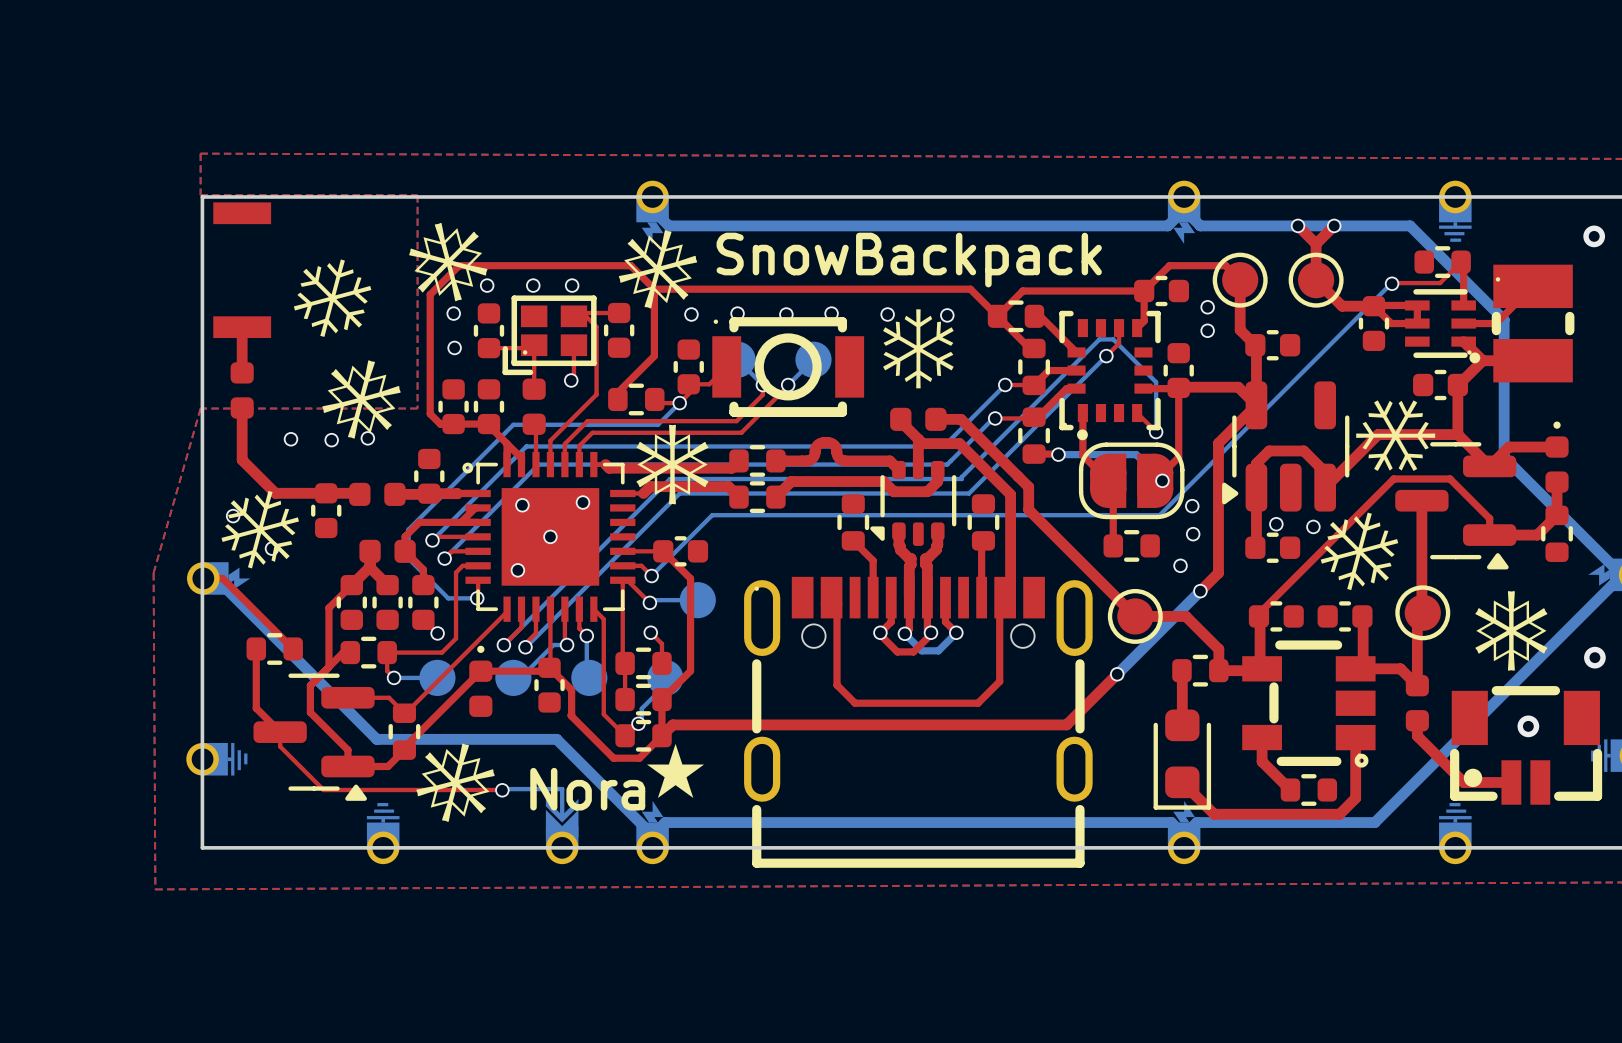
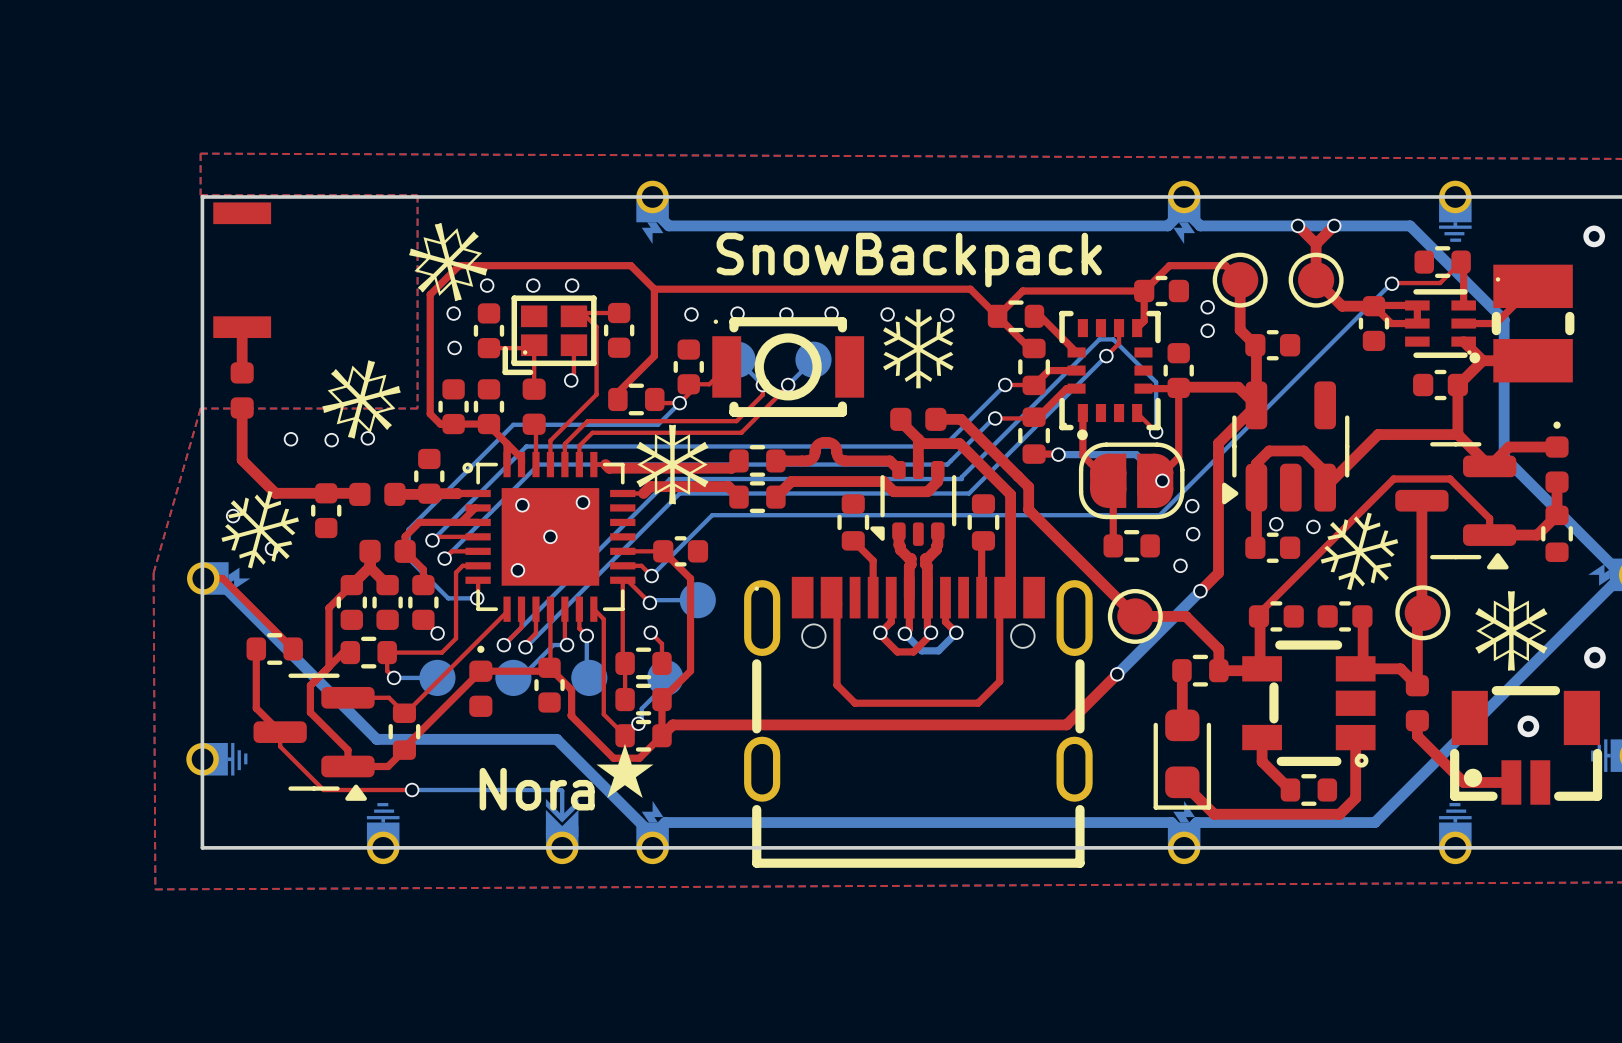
drawing: [618, 230, 698, 309] -> none
drawing: [293, 259, 372, 337] -> none
drawing: [1356, 400, 1436, 471] -> none
drawing: [416, 743, 495, 822] -> none
text position: ⋆ (675, 770) -> ⋆ (624, 770)
text position: Nora (587, 789) -> Nora (537, 789)
top track: (412, 790) (502, 790) -> none
bottom track: (502, 790) (562, 789) (562, 790) -> (412, 790) (562, 790)
via position: (502, 790) -> (412, 790)

